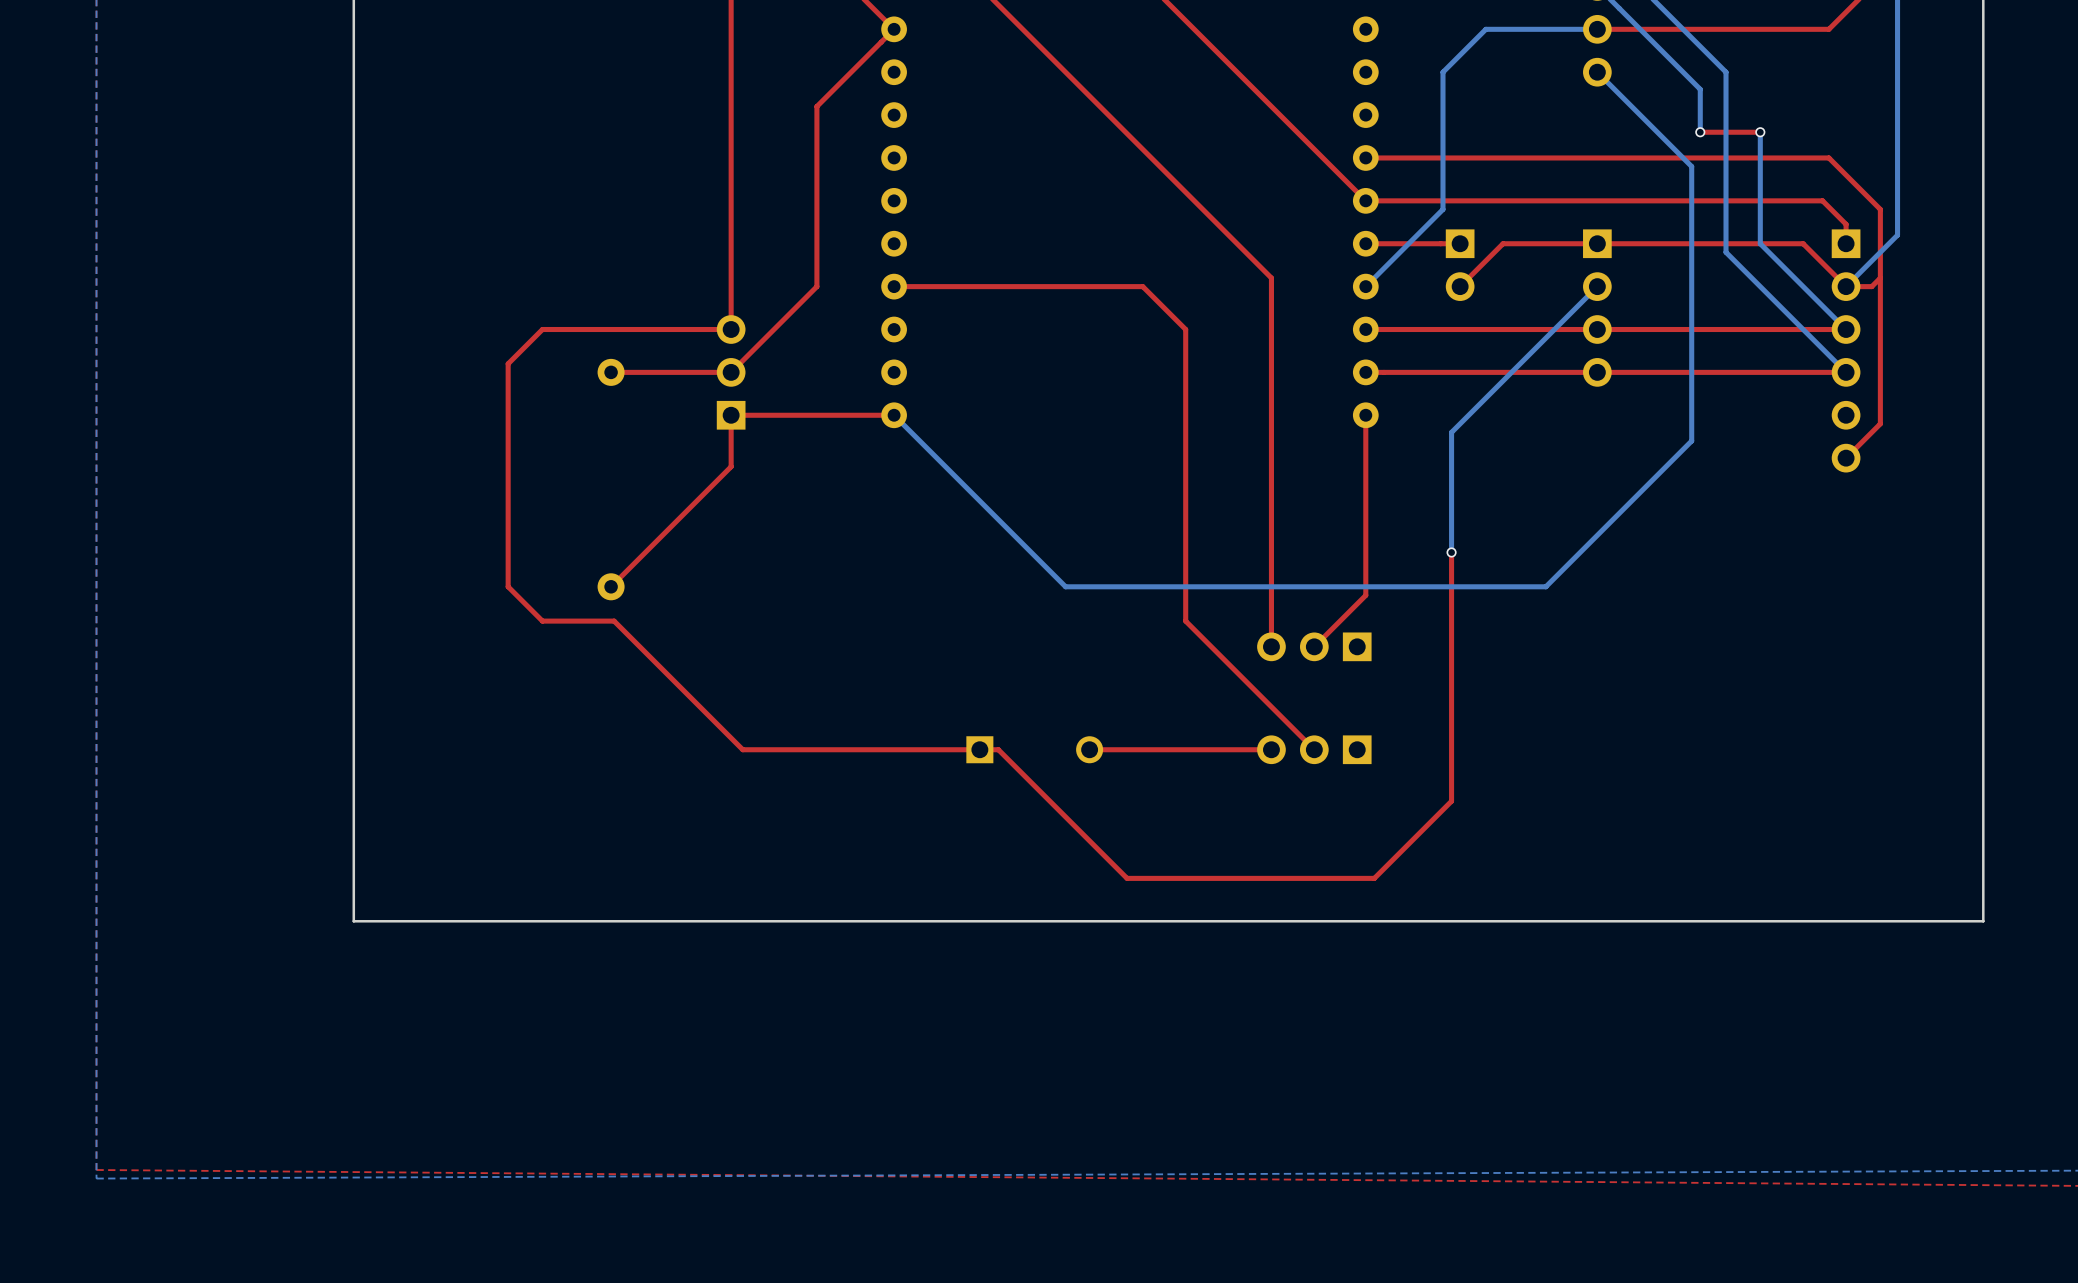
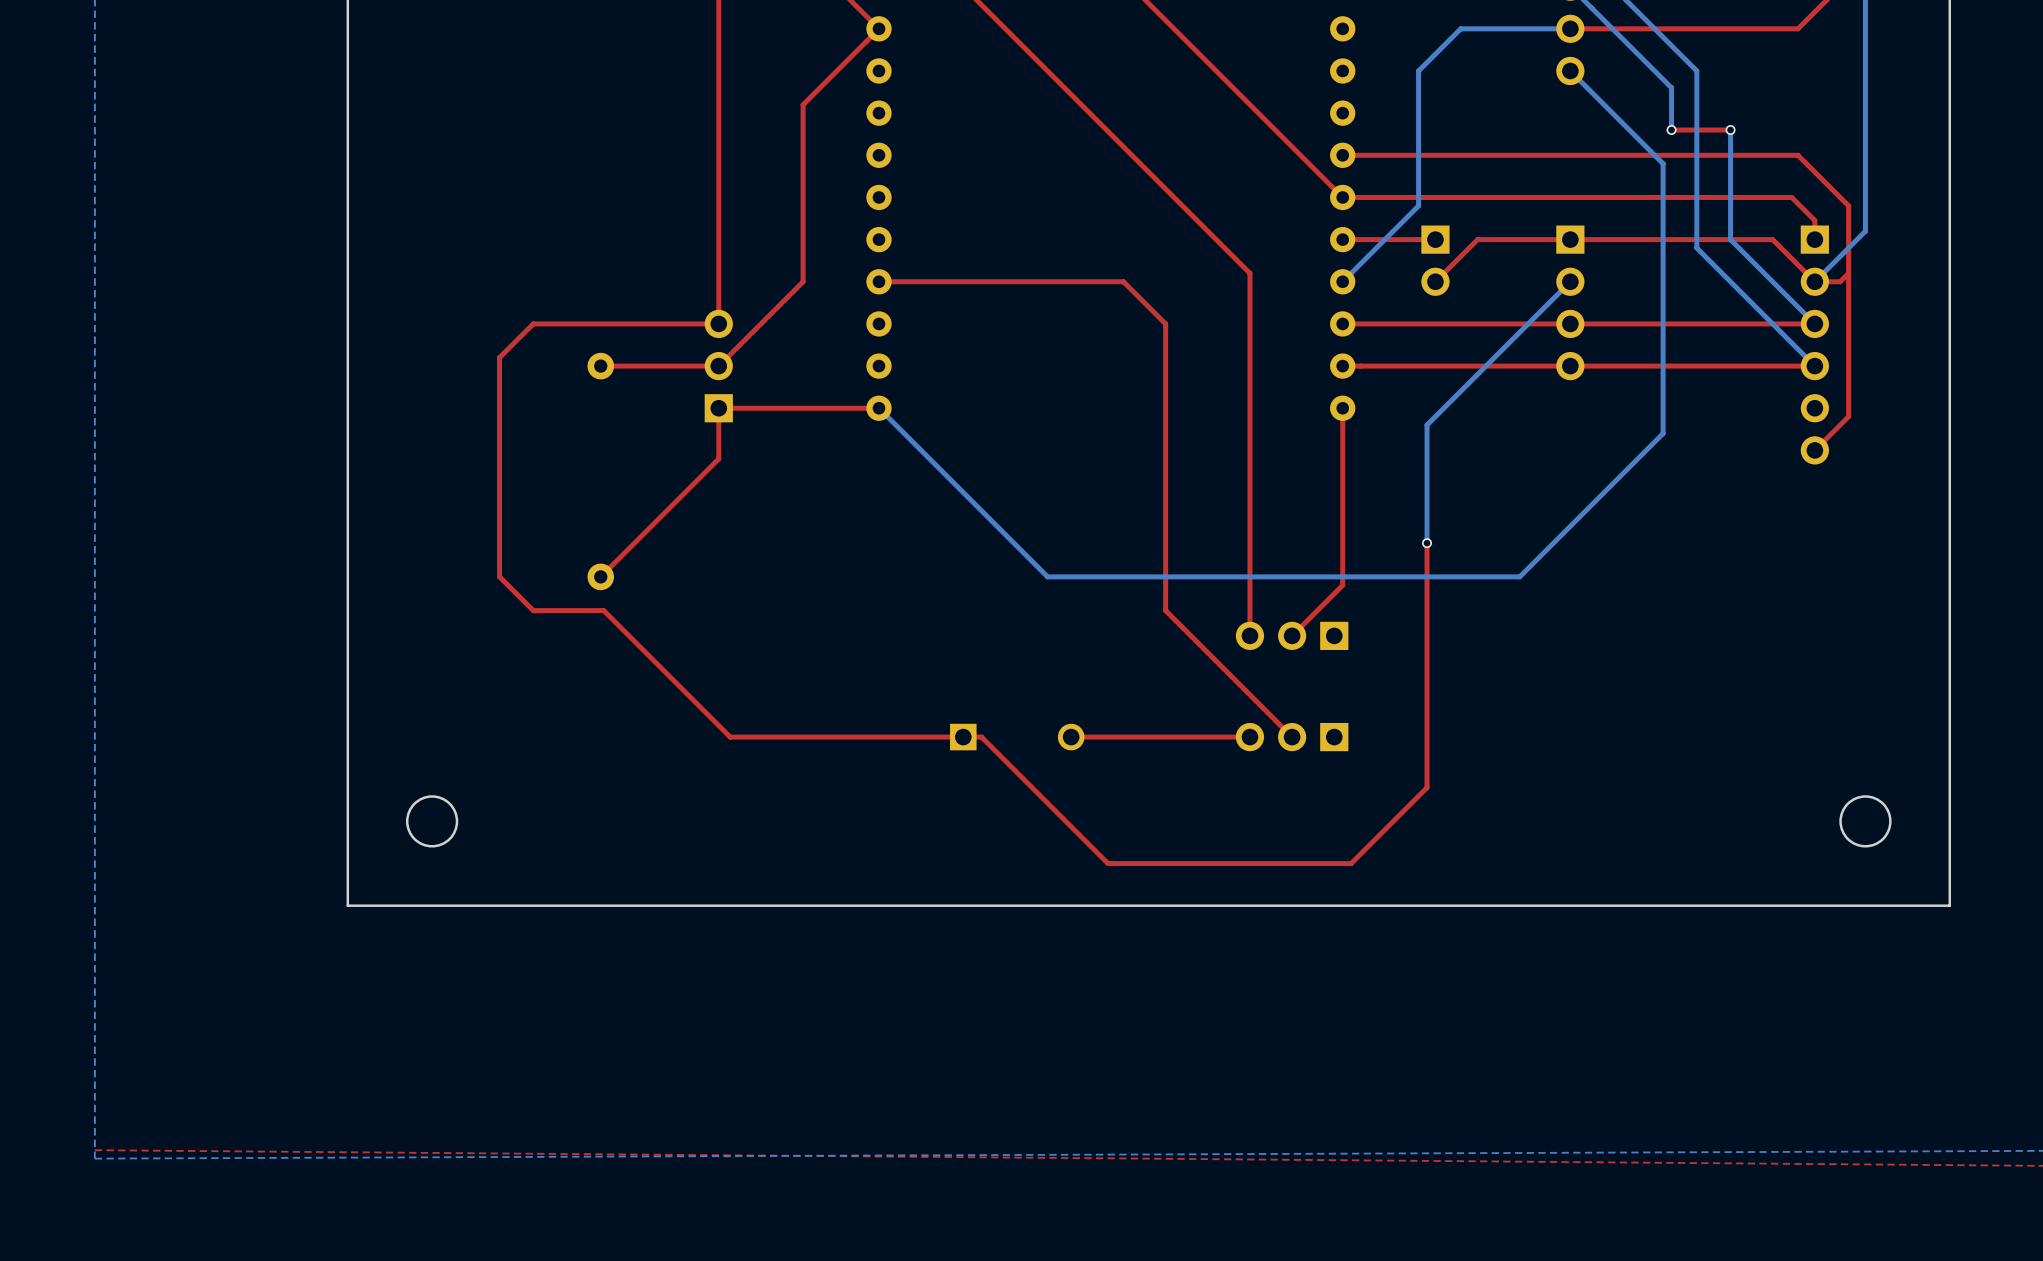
round board edge: none -> [405, 795, 459, 848]
round board edge: none -> [1839, 795, 1892, 848]

